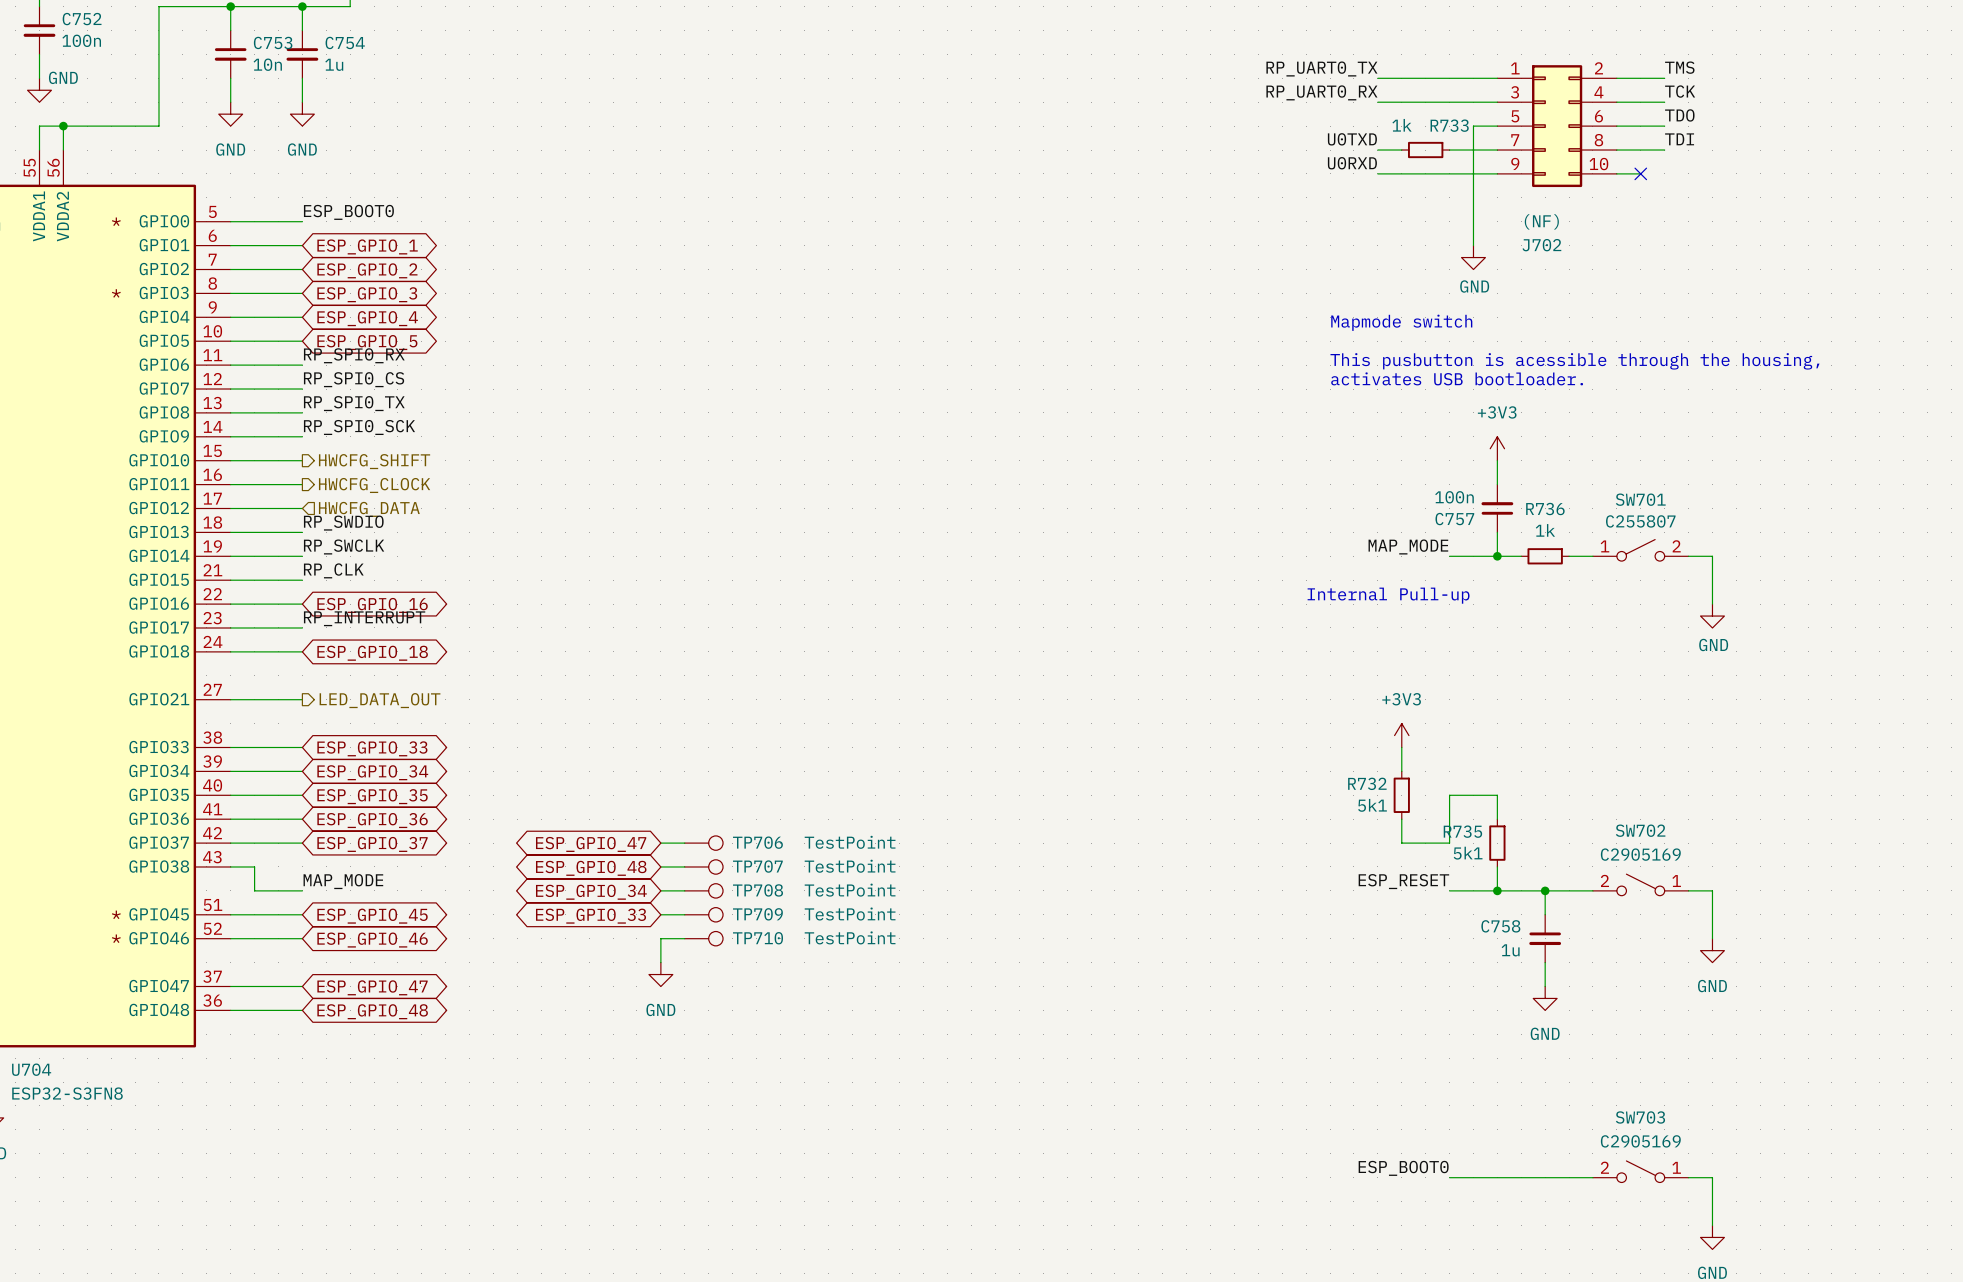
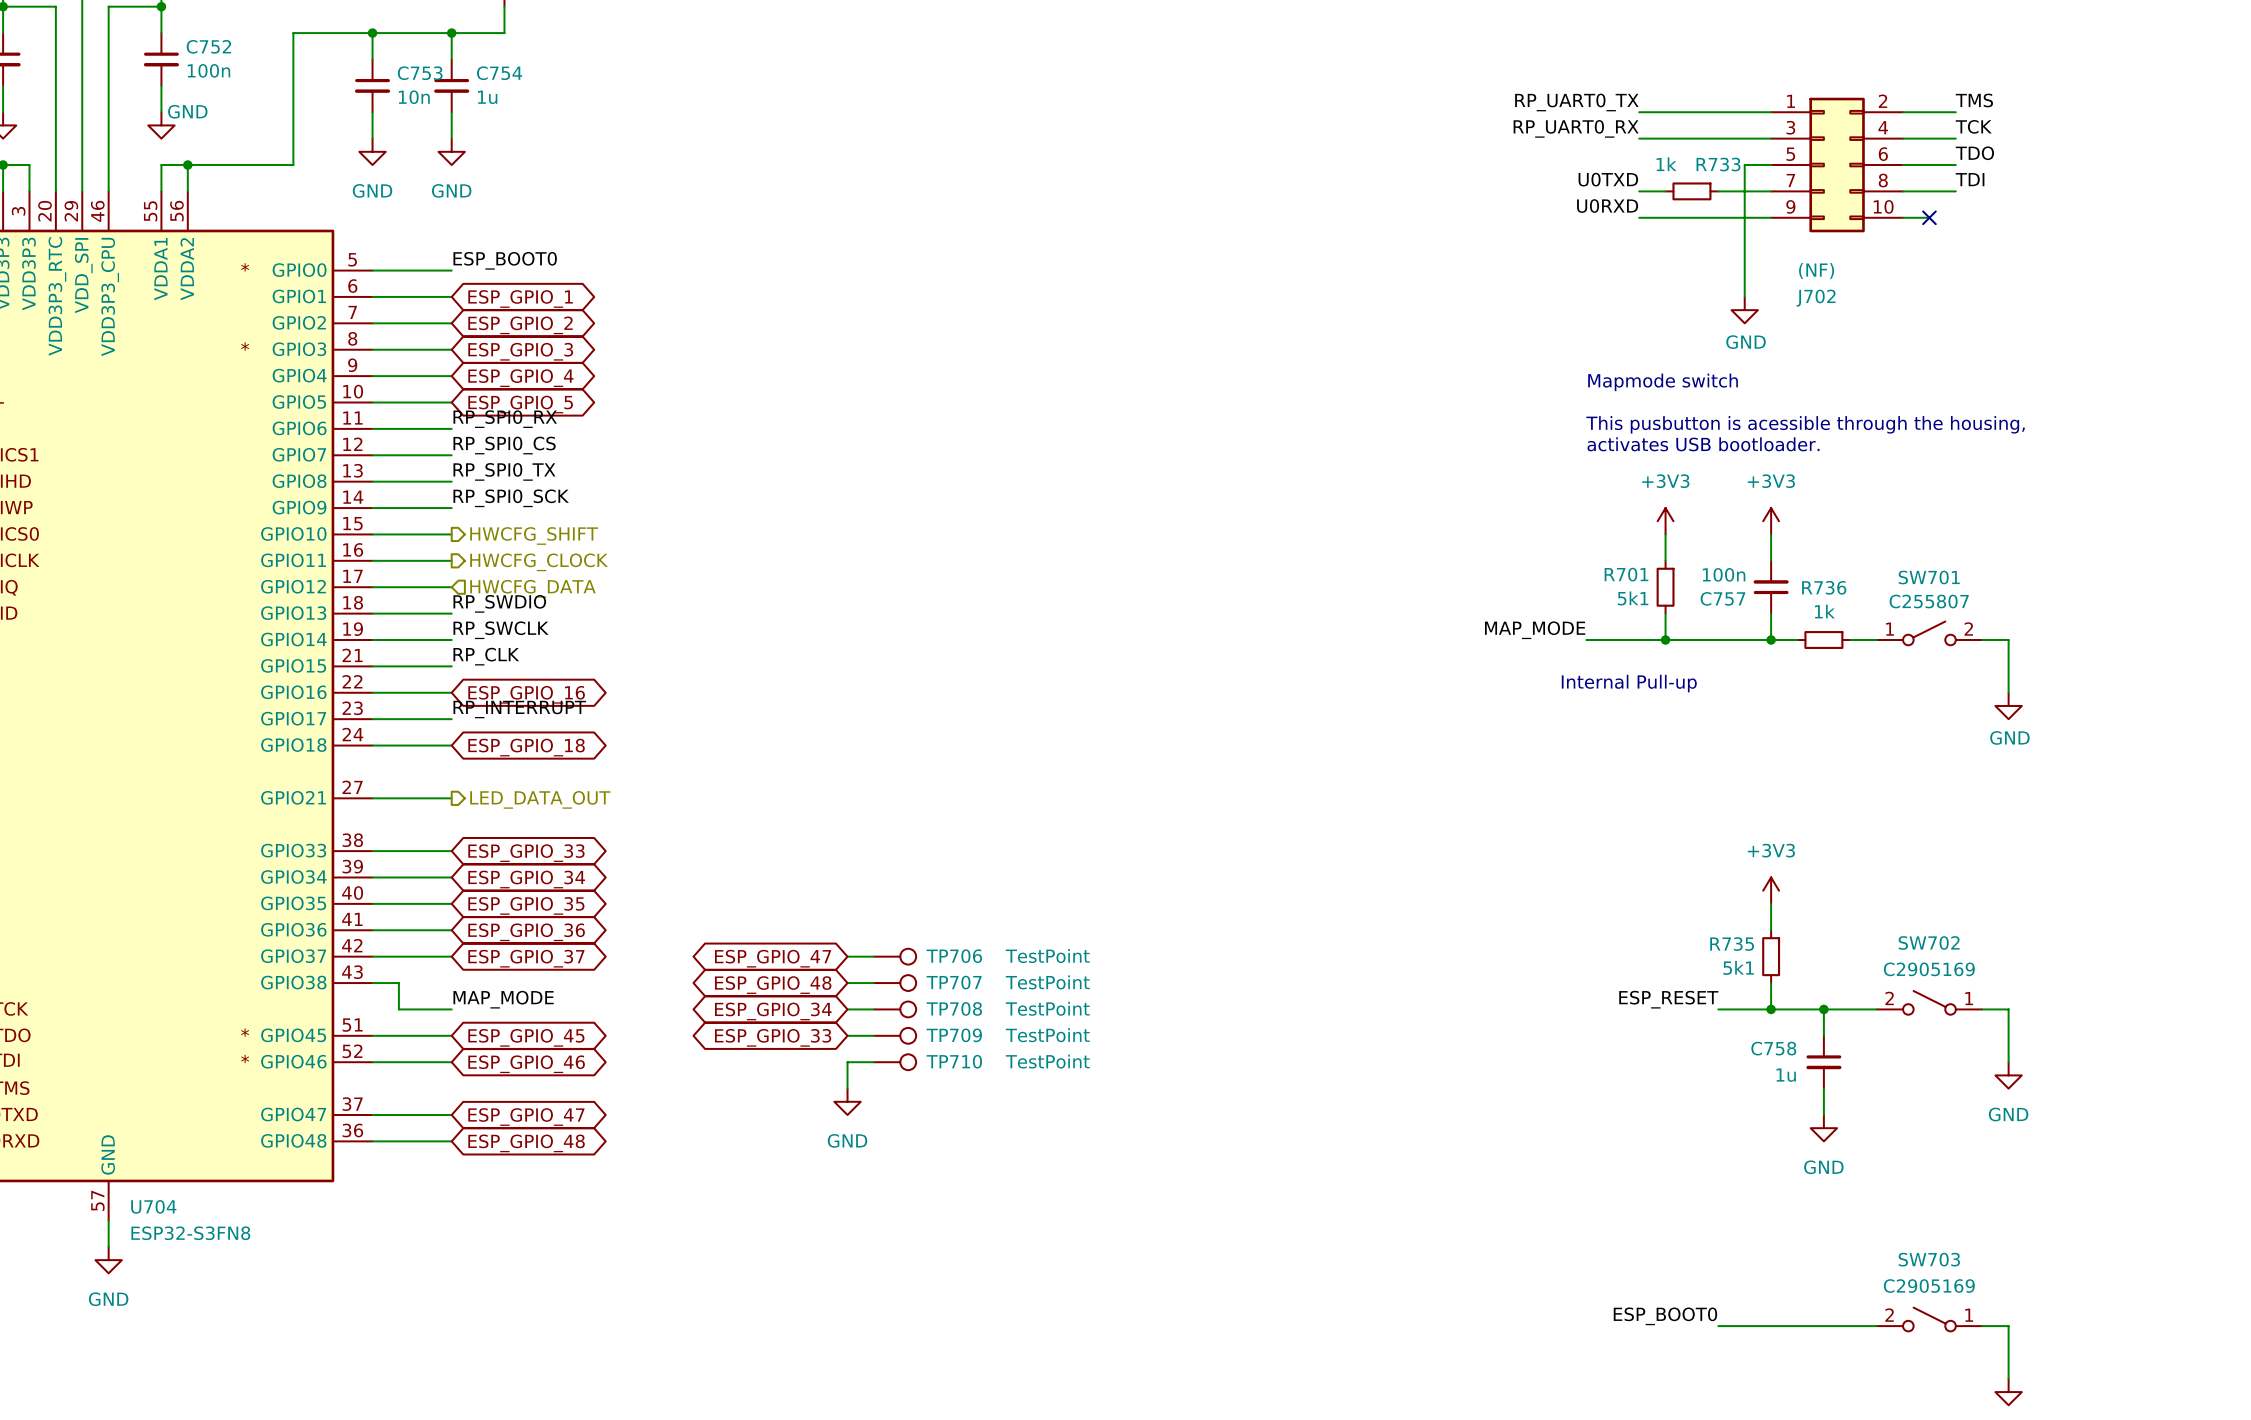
power symbol: none -> +3V3 (1665, 521)
wire: none -> (1665, 534) (1665, 560)
R701: none -> 5k1 (1665, 587)
label position: MAP_MODE (1408, 546) -> MAP_MODE (1535, 630)
wire: none -> (1586, 640) (1718, 640)
junction: none -> (1665, 640)
power symbol position: +3V3 (1401, 735) -> +3V3 (1771, 890)
wire: (1401, 747) (1401, 771) -> (1665, 613) (1665, 640)
R732: 5k1 (1401, 795) -> none
wire: (1497, 795) (1449, 795) (1449, 843) (1401, 843) (1401, 819) -> none

